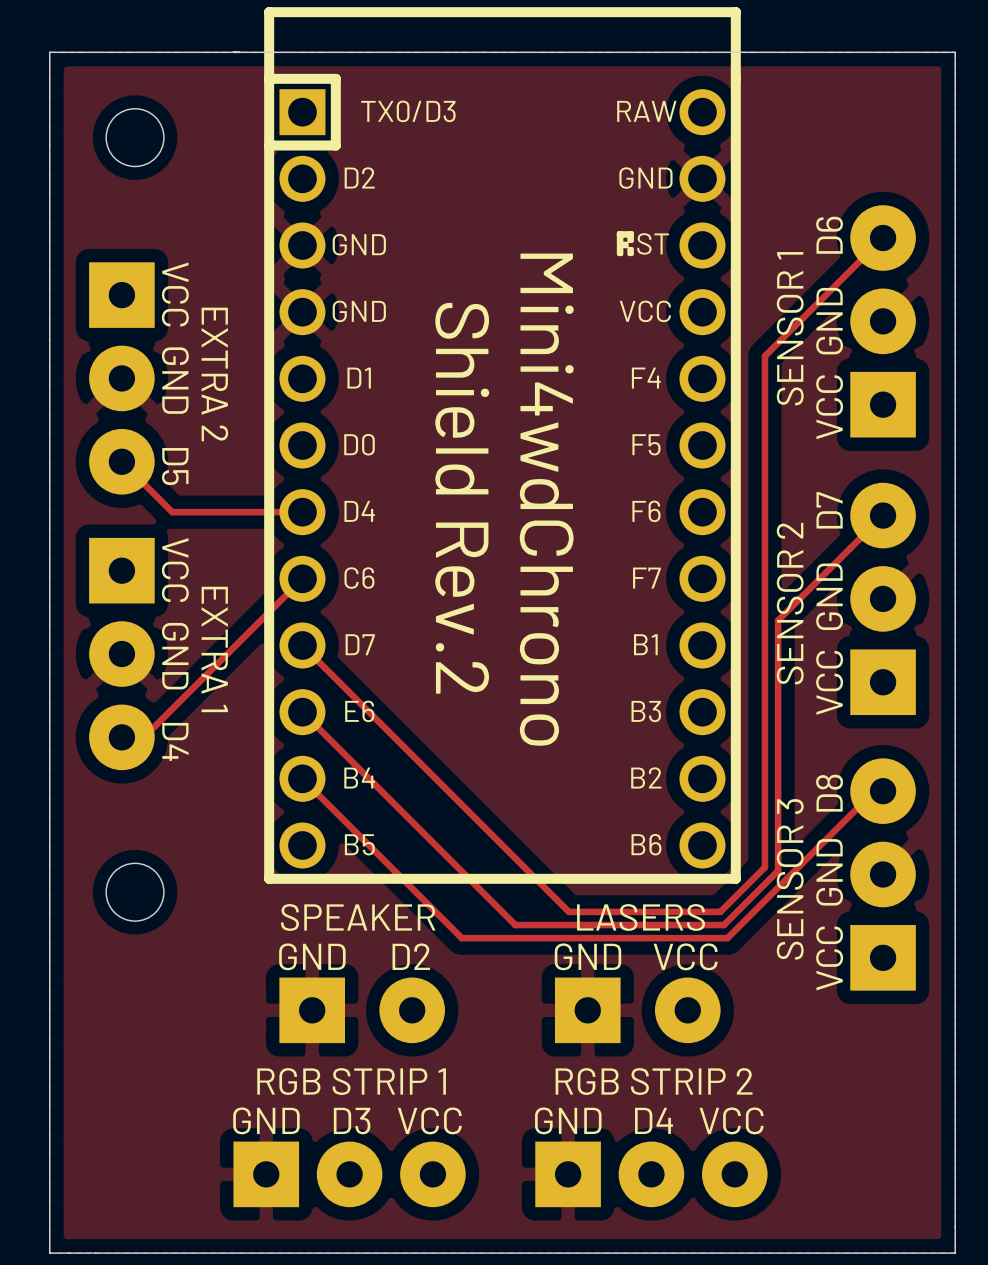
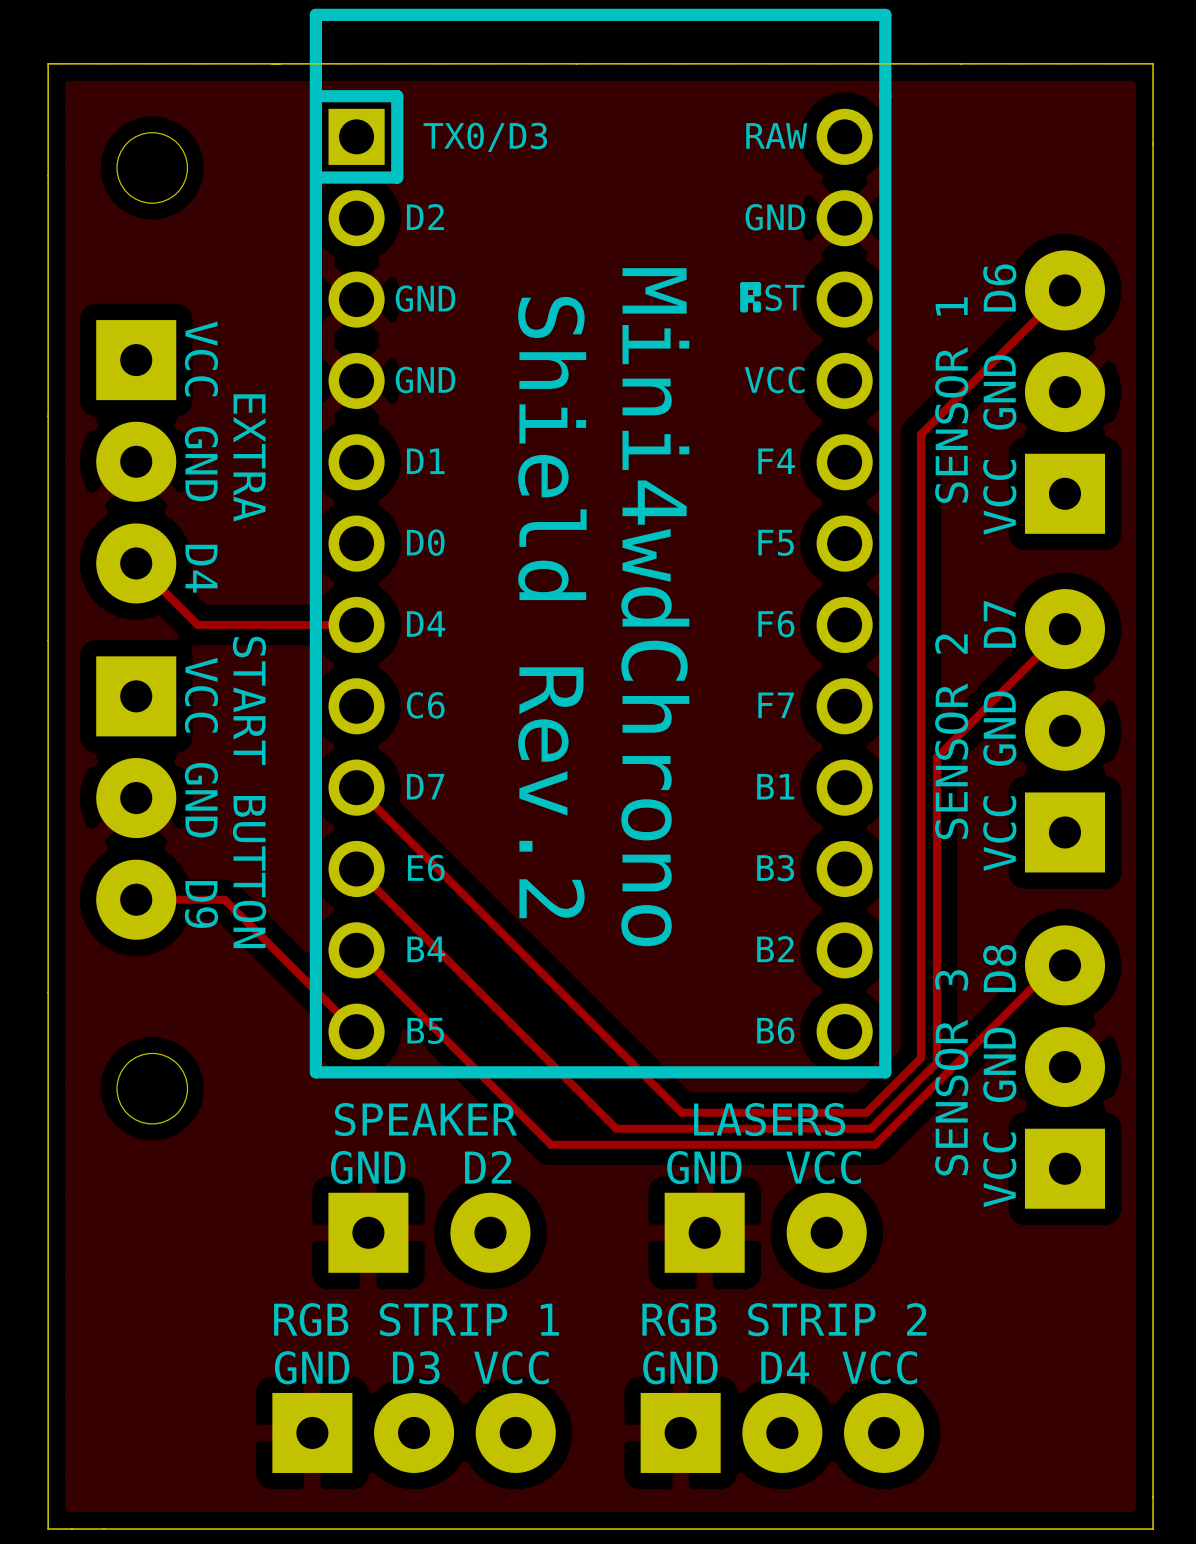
text: EXTRA 2 (214, 374) -> EXTRA (249, 457)
text: D5 (175, 466) -> D4 (201, 568)
track: (302, 578) (143, 737) -> (356, 1031) (224, 899) (163, 899)
text: EXTRA 1 (214, 649) -> START BUTTON (249, 792)
text: D4 (175, 741) -> D9 (201, 904)

